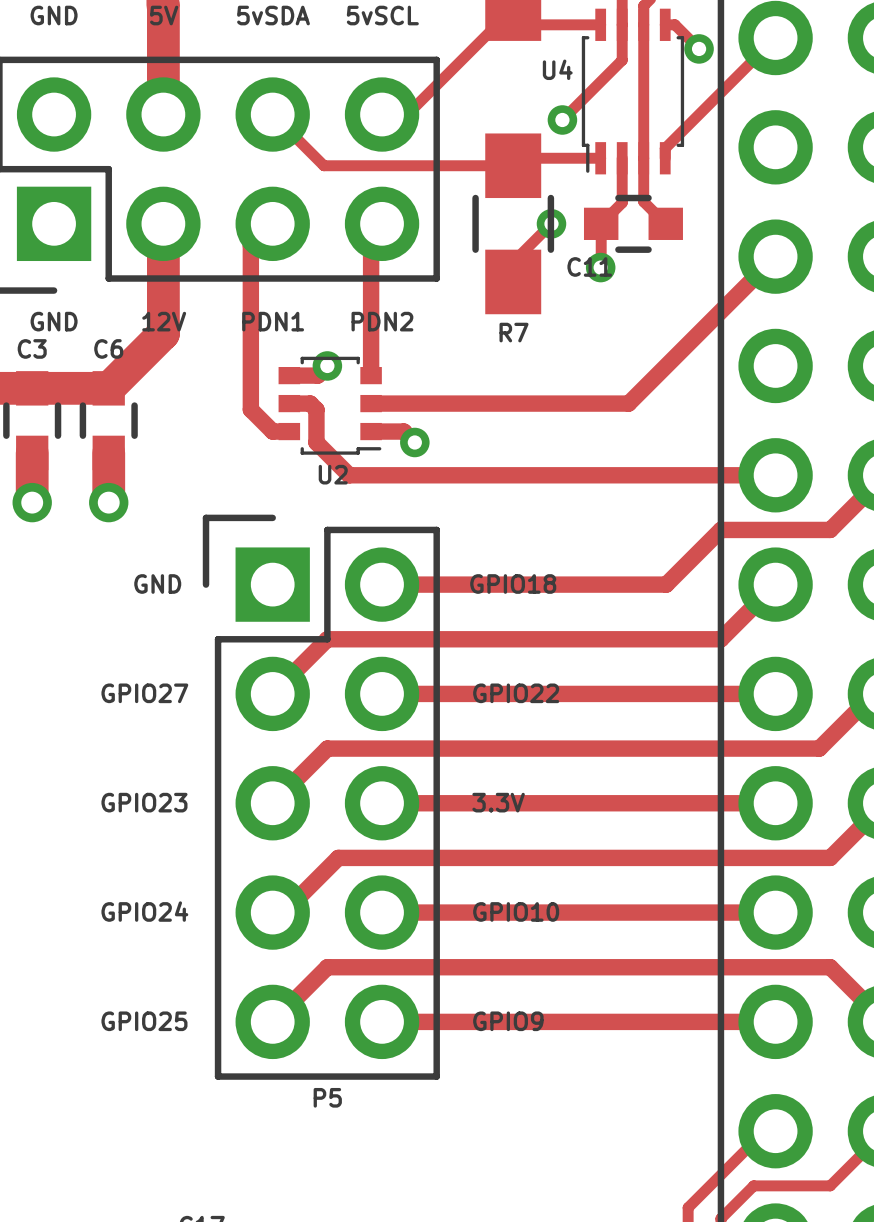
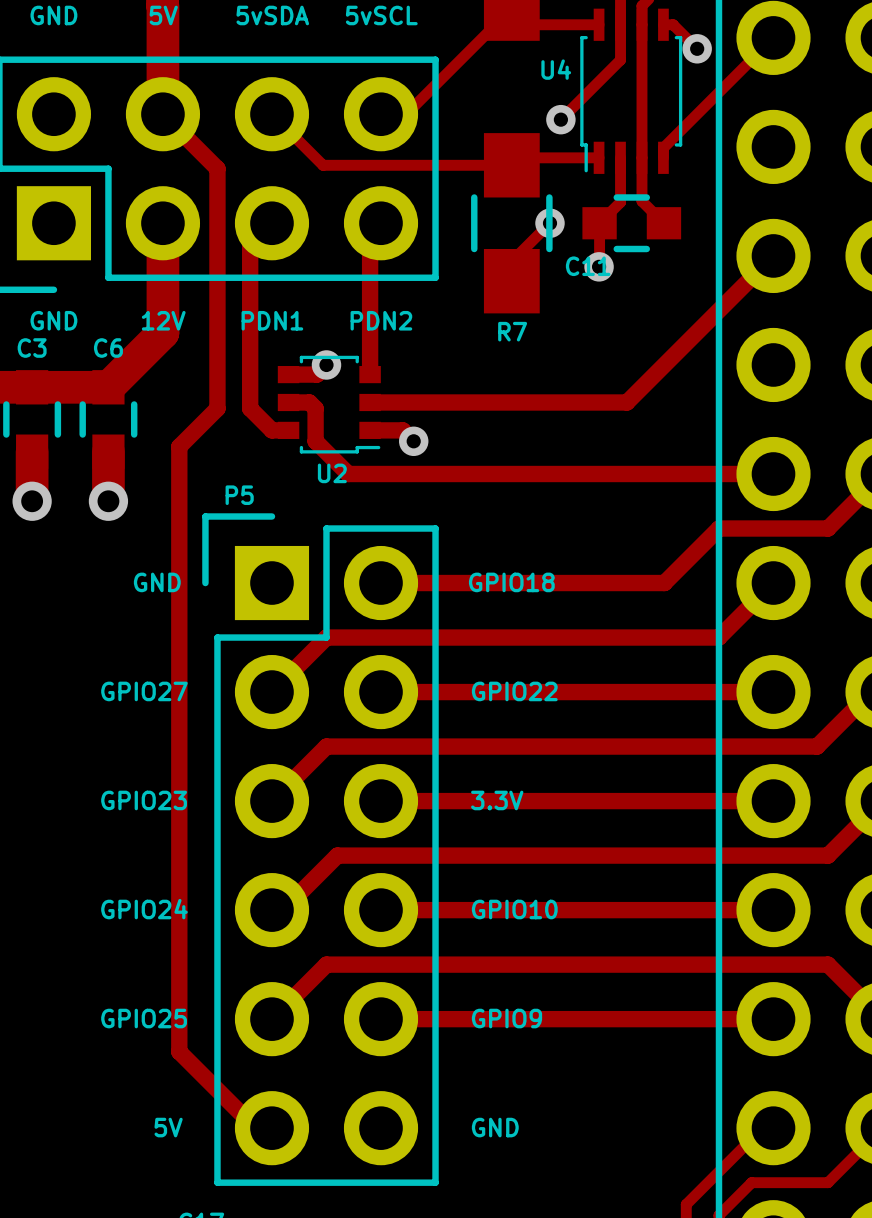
track: none -> (162, 114) (217, 168) (217, 408) (179, 446) (179, 1051) (255, 1128) (271, 1128)
P5 footprint: [202, 514, 440, 1080] -> [202, 513, 439, 1186]
P5 name position: P5 (327, 1097) -> P5 (239, 495)
text: none -> 5V (168, 1127)
text: none -> GND (495, 1127)

